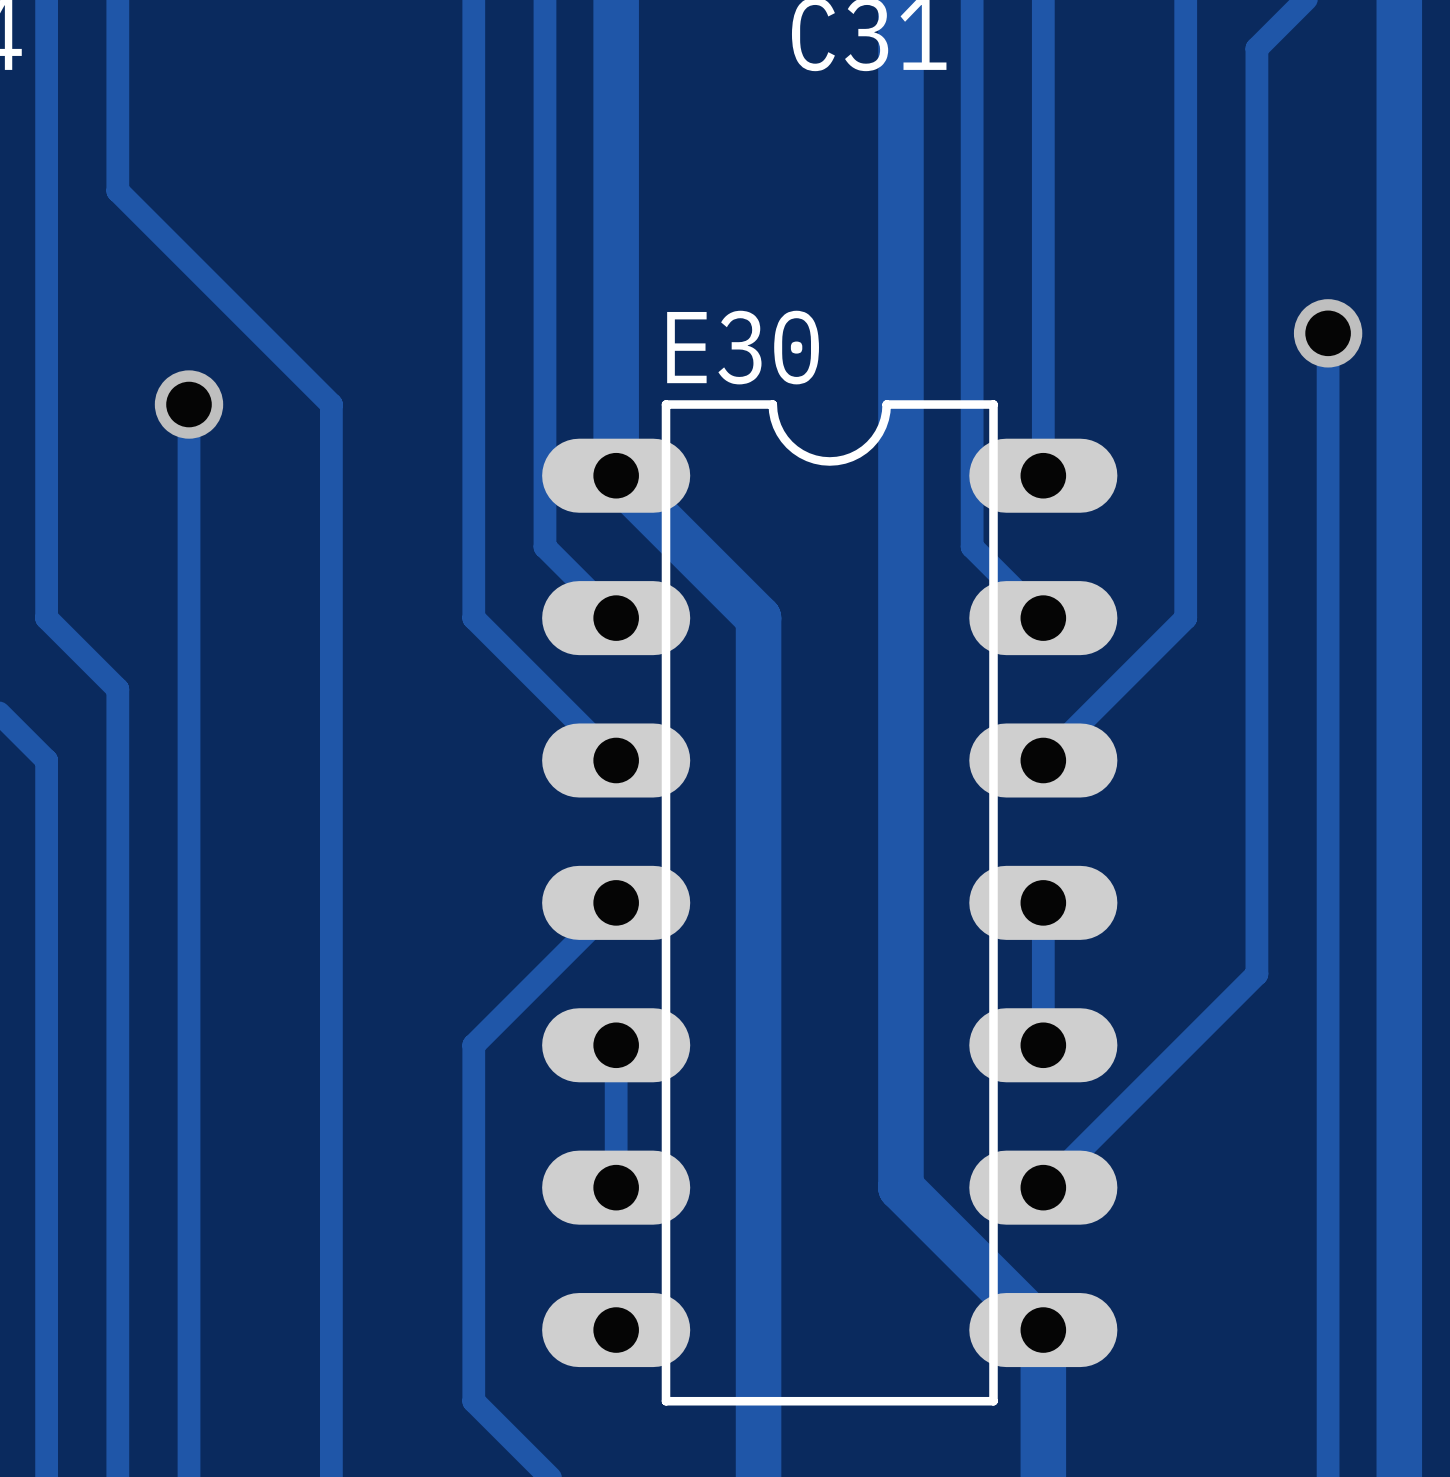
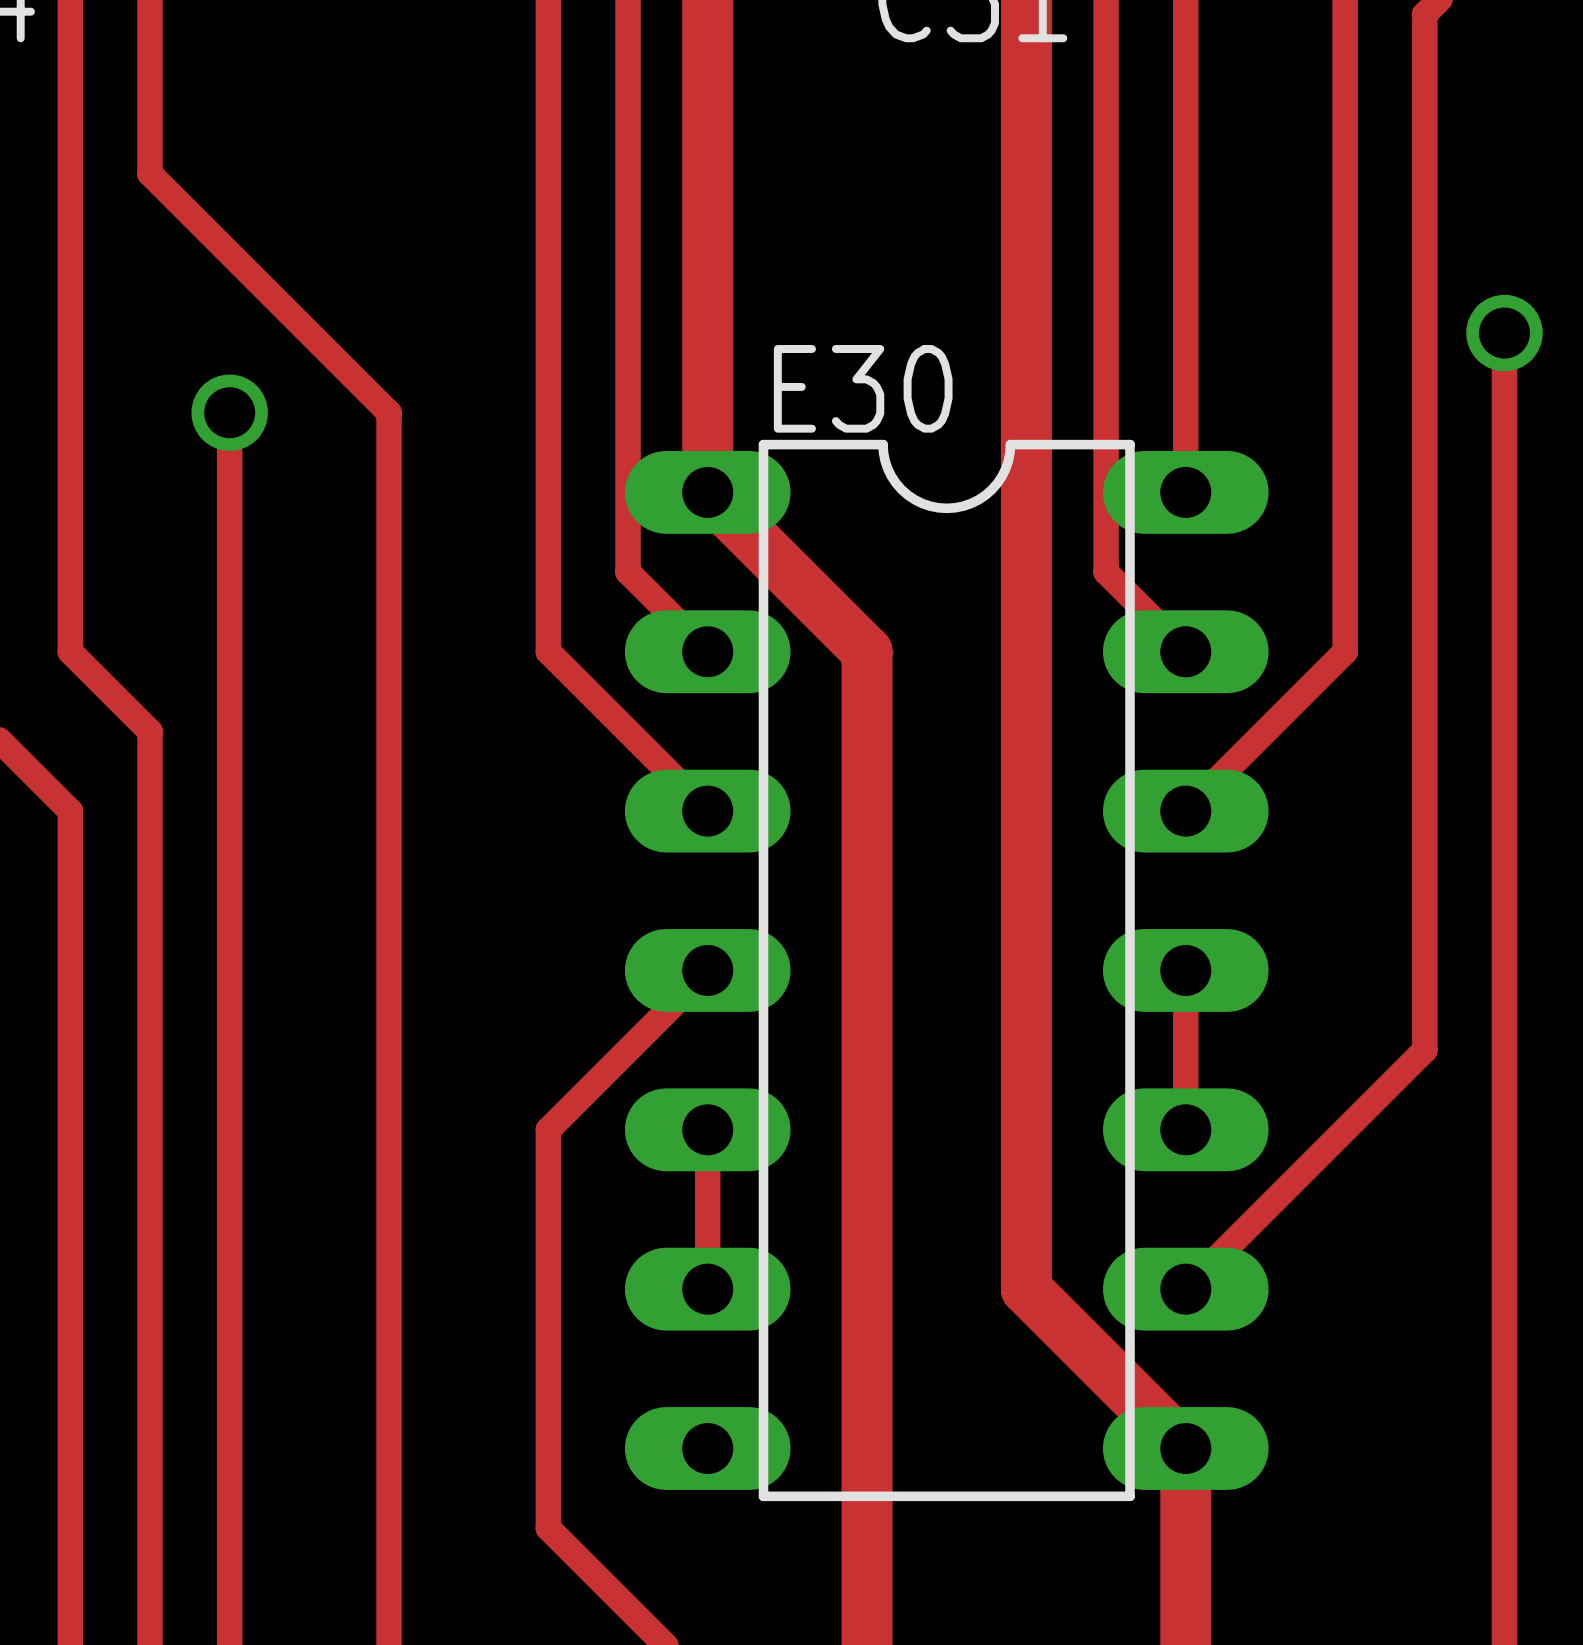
E30 name position: E30 (743, 347) -> E30 (863, 388)
E30 footprint: [542, 400, 1118, 1406] -> [624, 439, 1269, 1502]

